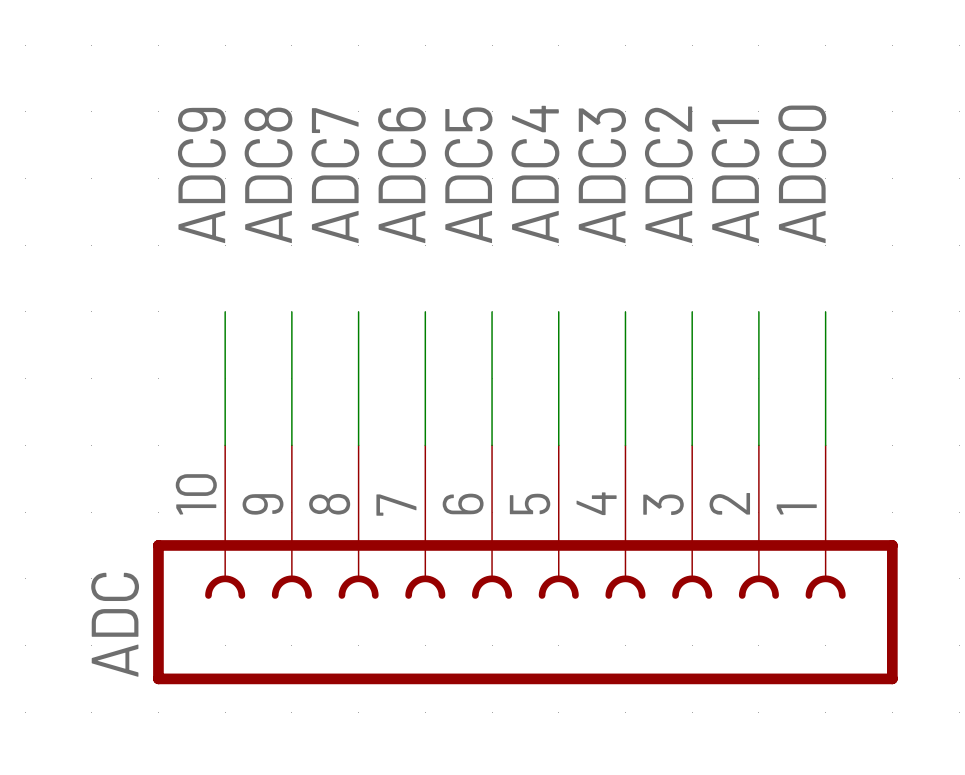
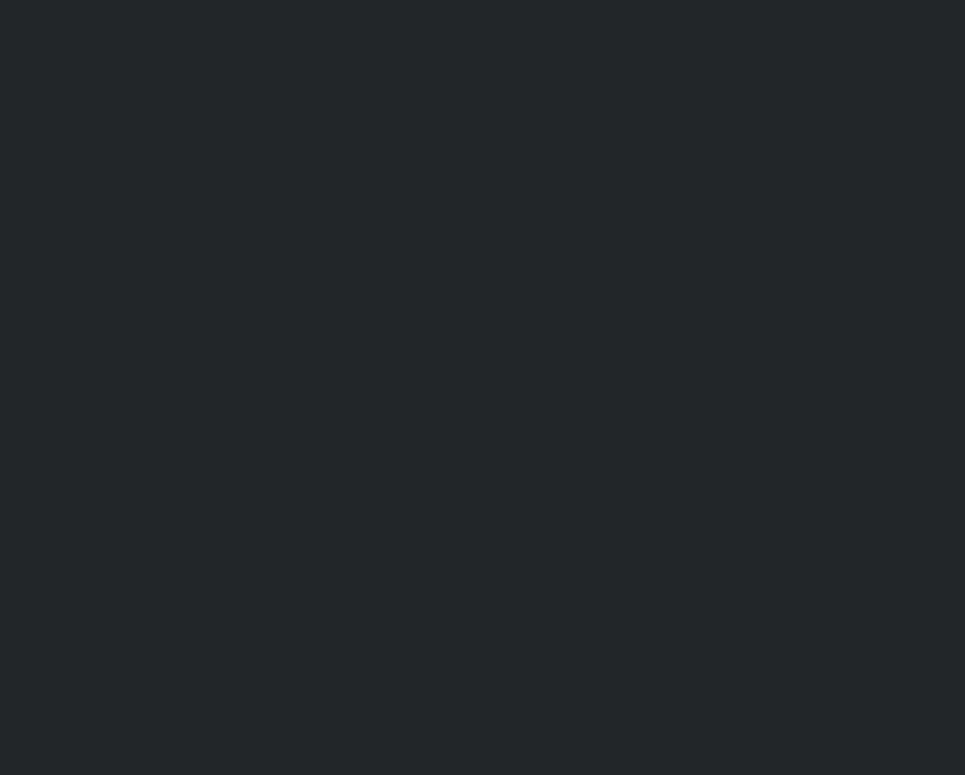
label: ADC4 (535, 174) -> none
label: ADC2 (668, 174) -> none
label: ADC0 (802, 174) -> none
label: ADC9 (201, 175) -> none
label: ADC8 (268, 175) -> none
label: ADC7 (335, 175) -> none
label: ADC6 (402, 175) -> none
label: ADC5 (468, 175) -> none
label: ADC3 (602, 175) -> none
label: ADC1 (735, 181) -> none
wire: (225, 311) (225, 445) -> none
wire: (291, 311) (291, 445) -> none
wire: (358, 311) (358, 445) -> none
wire: (425, 311) (425, 445) -> none
wire: (492, 311) (492, 445) -> none
wire: (558, 311) (558, 445) -> none
wire: (625, 311) (625, 445) -> none
wire: (692, 311) (692, 445) -> none
wire: (758, 311) (758, 445) -> none
wire: (825, 311) (825, 445) -> none
ADC: (525, 564) -> none

